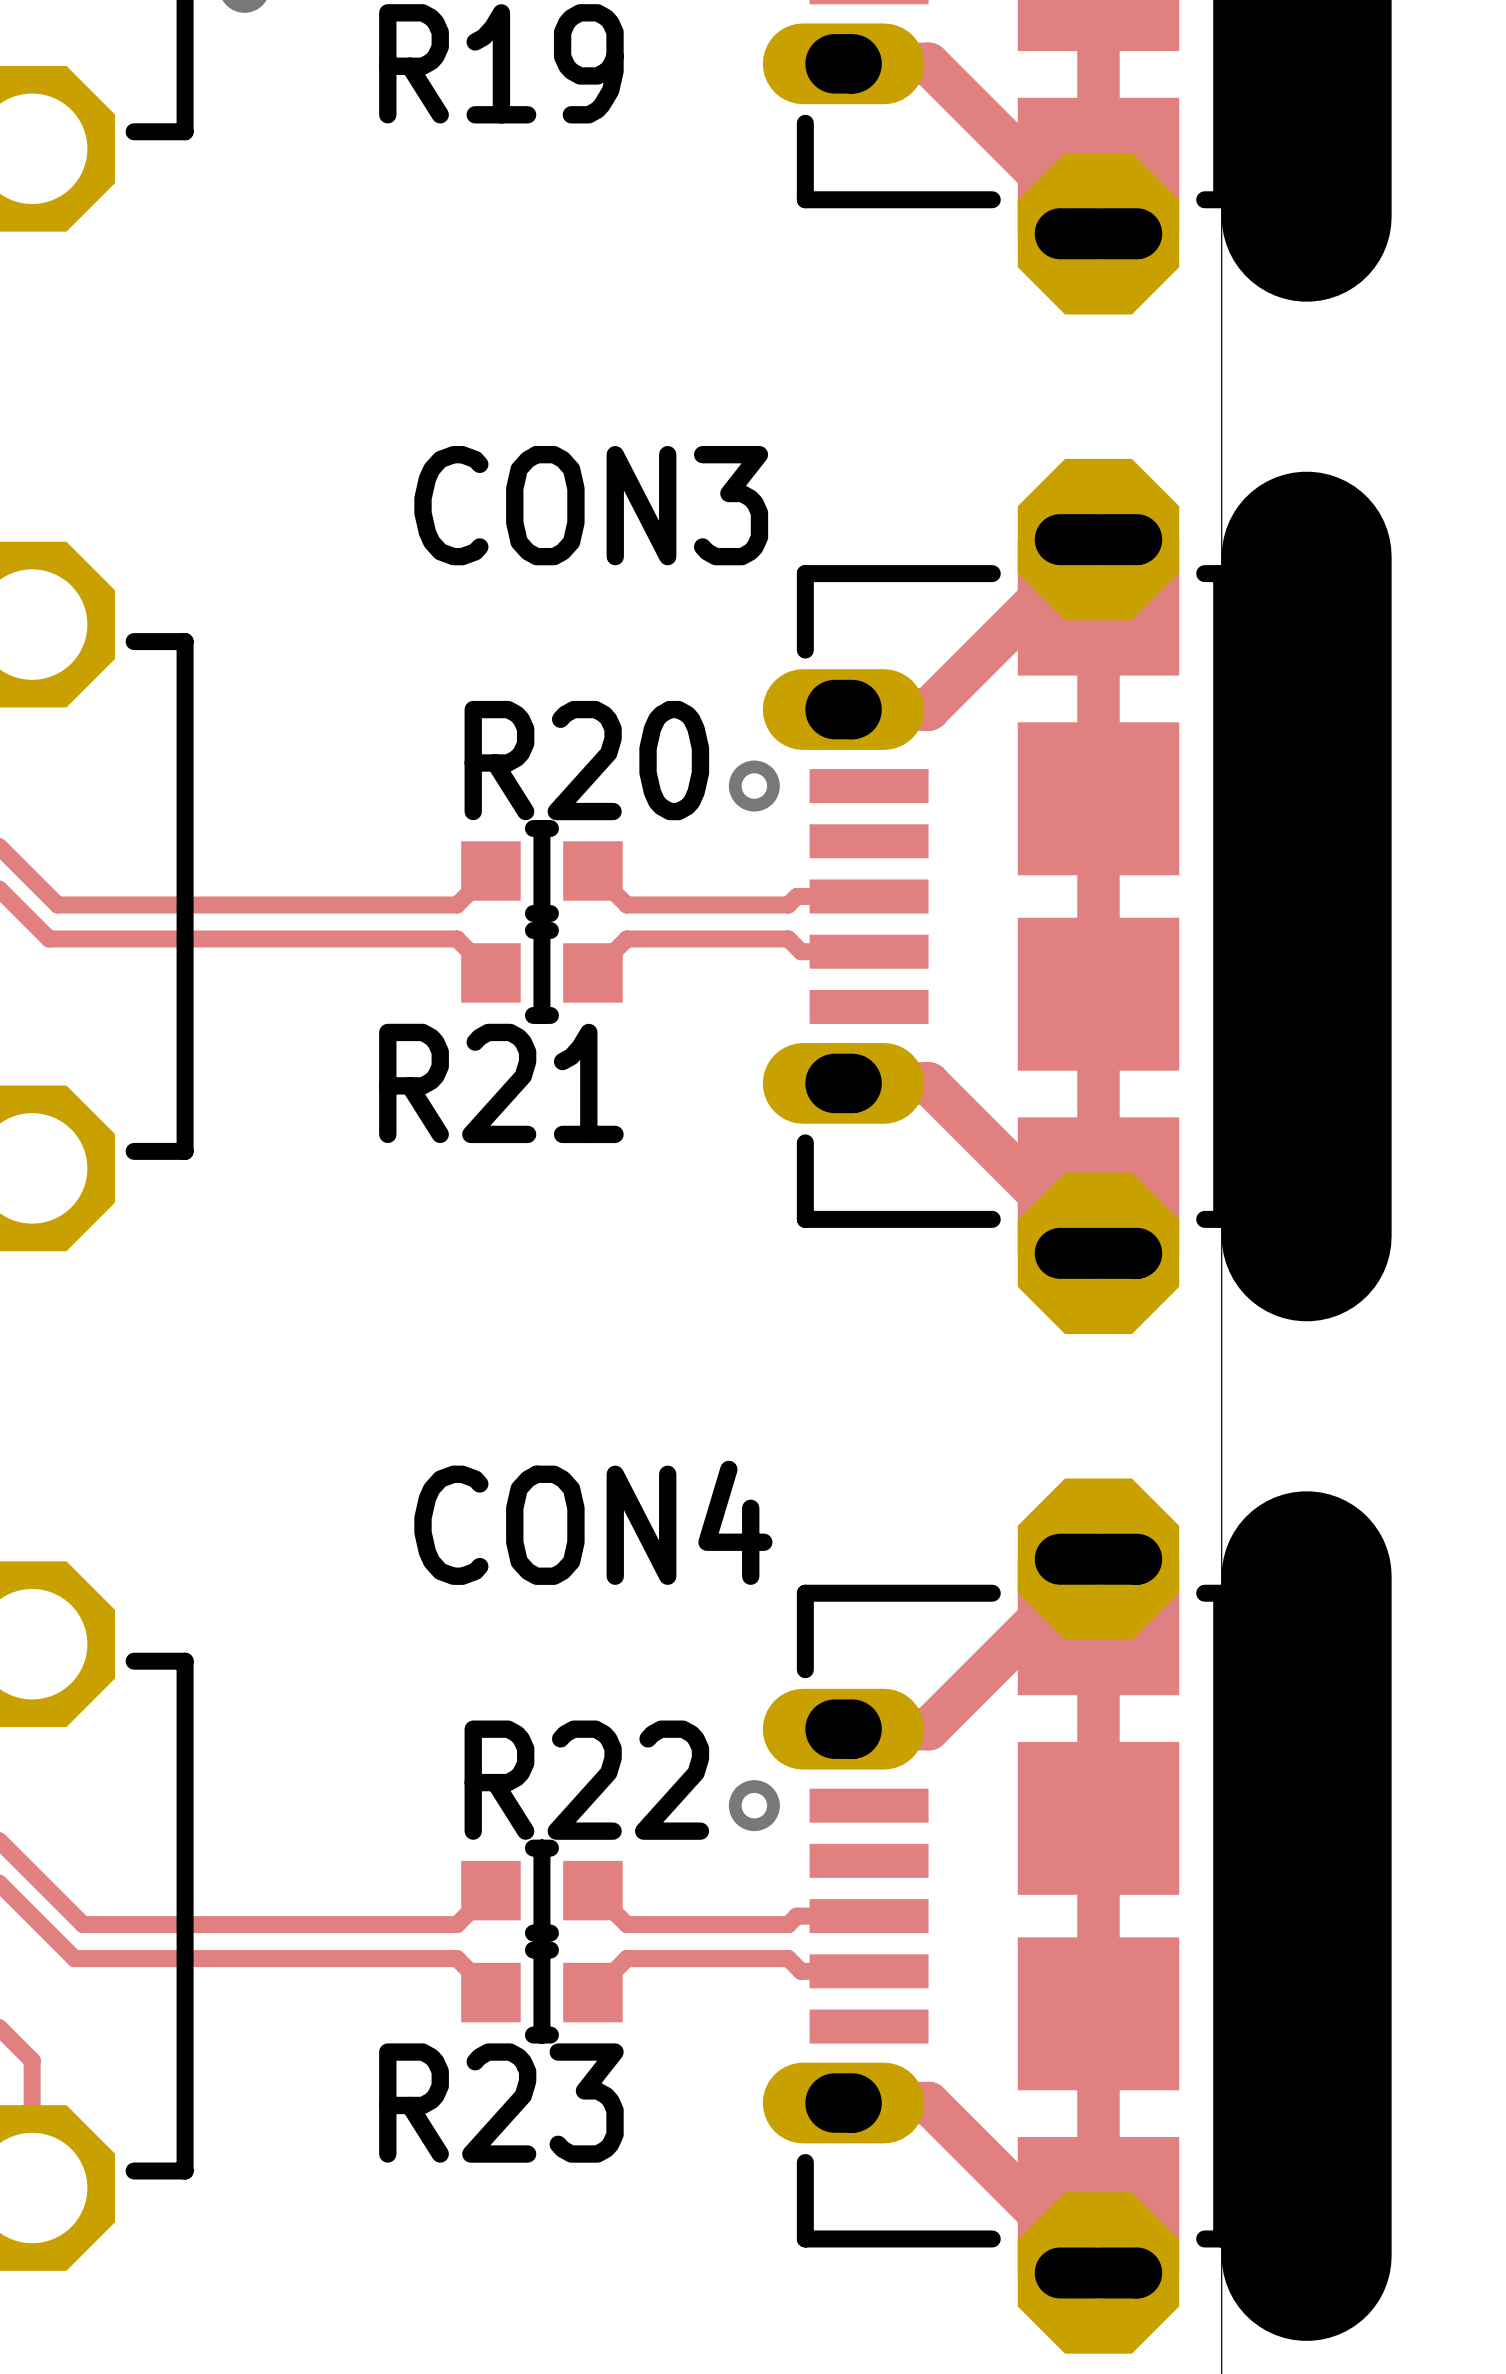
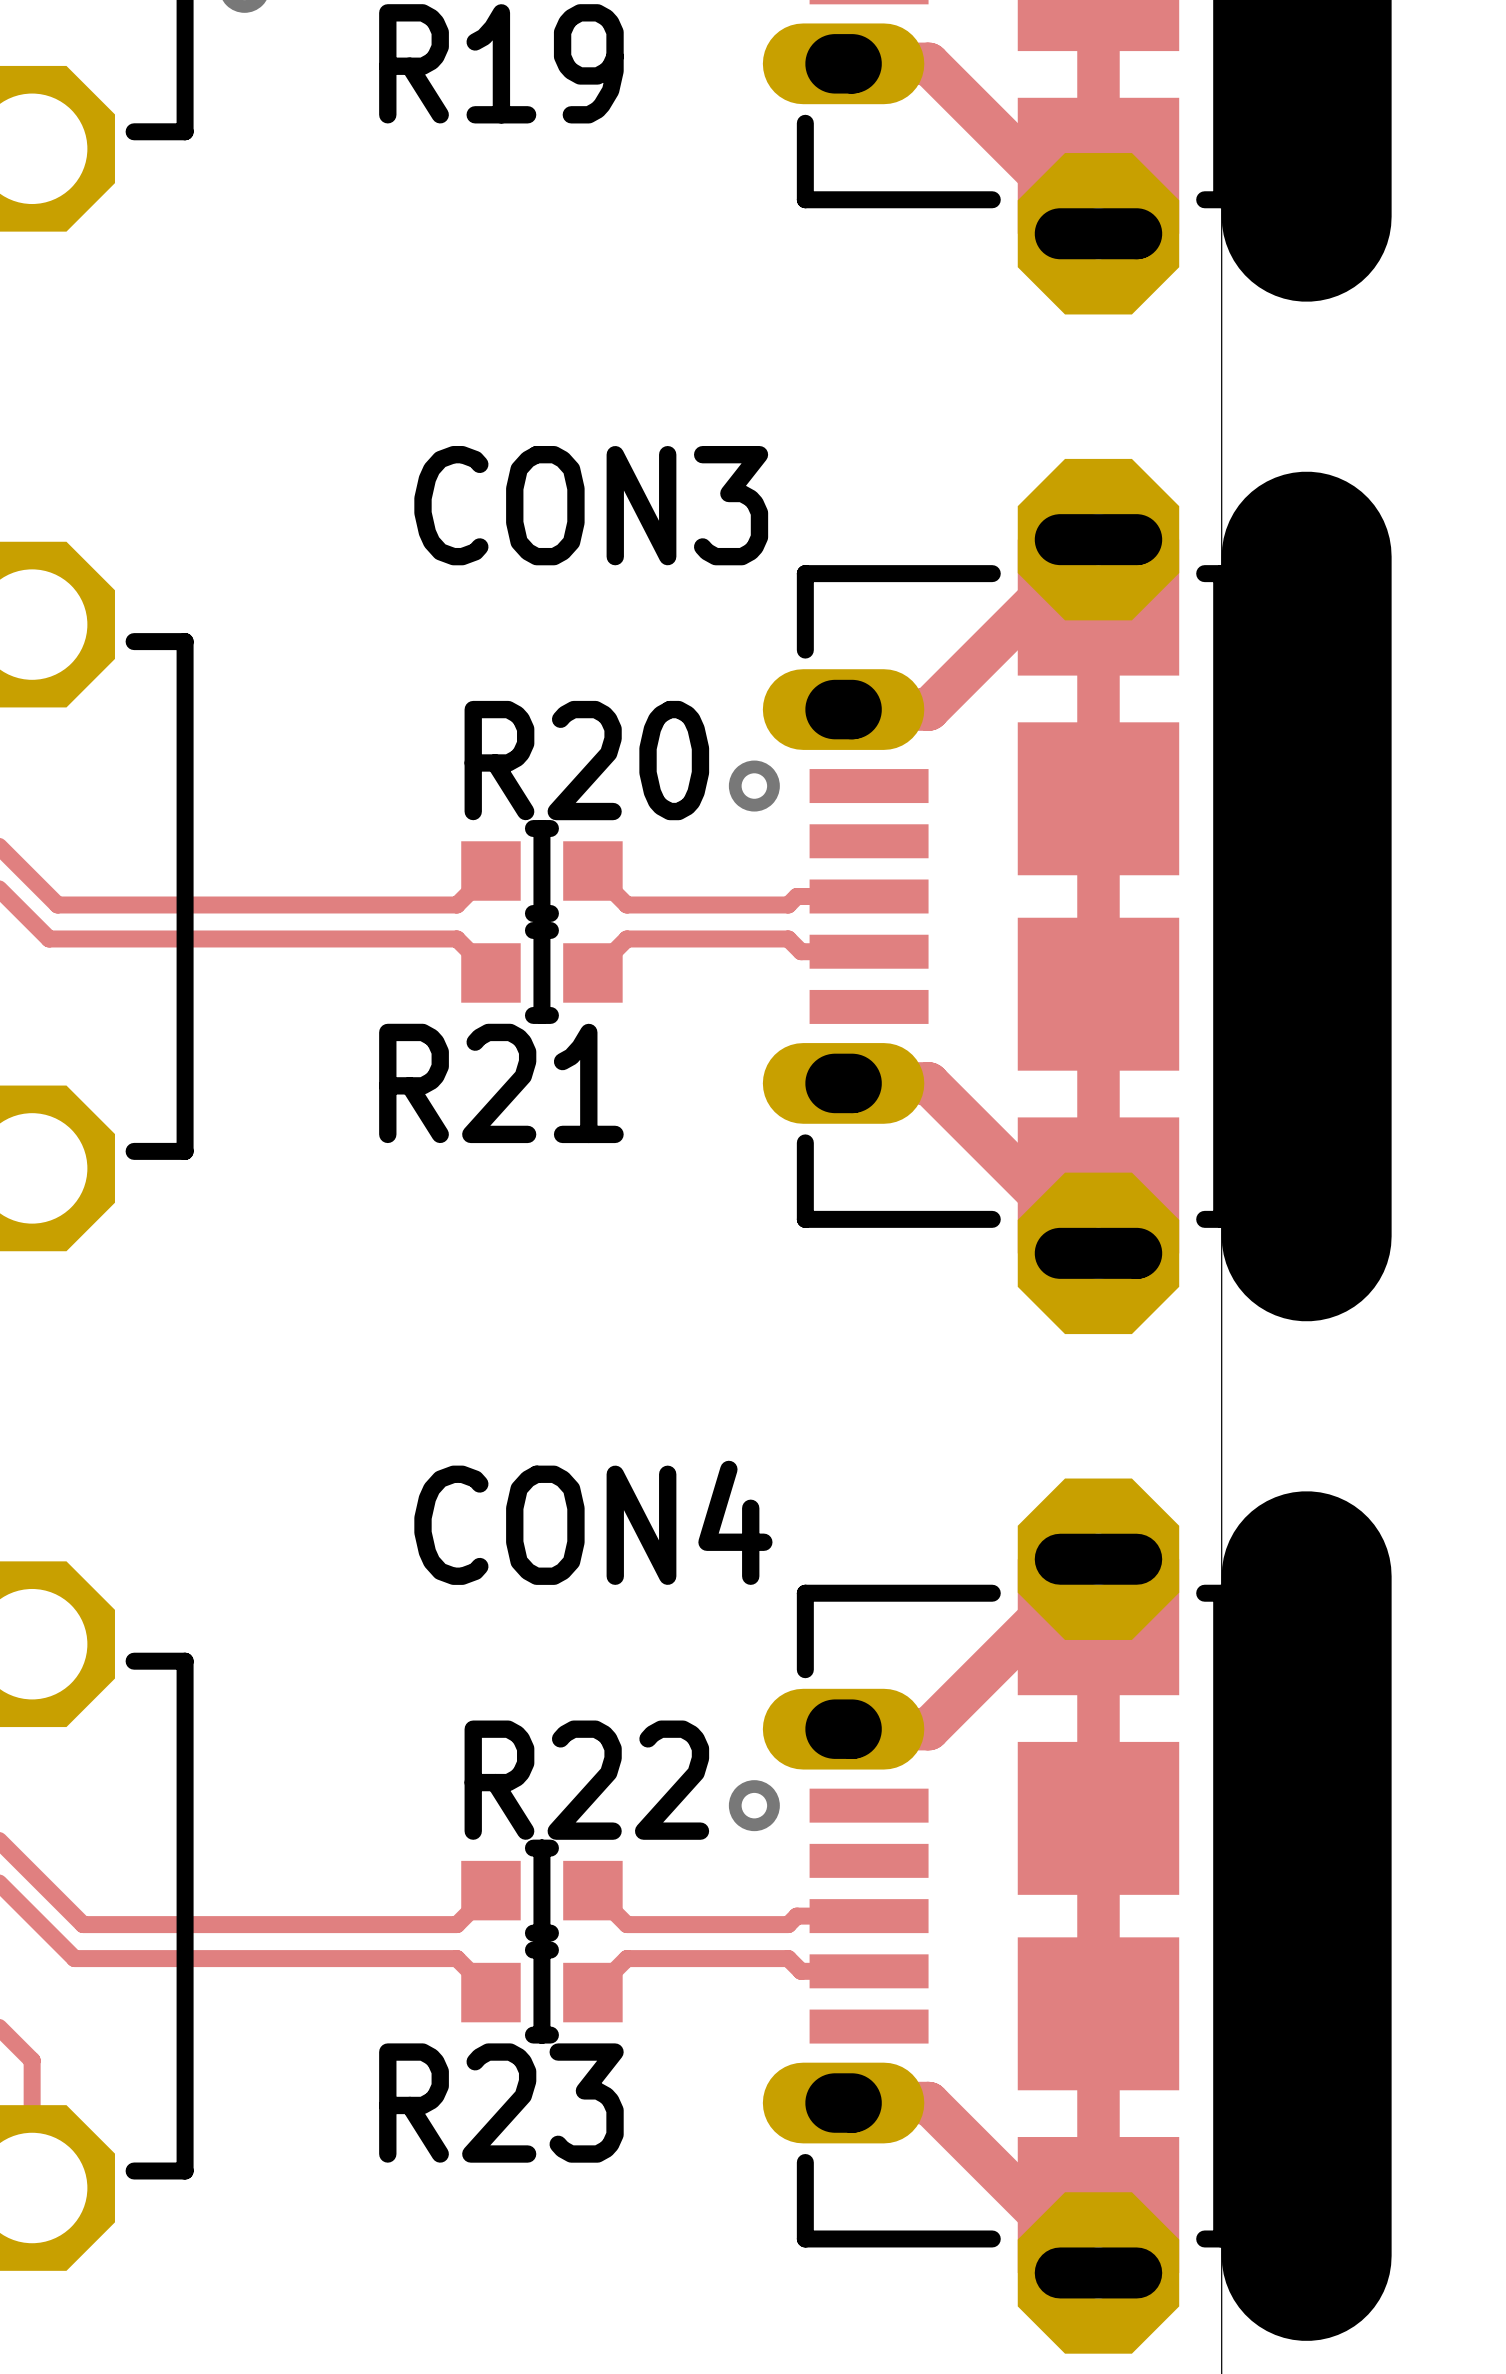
CON4 footprint: [762, 1478, 1231, 2354] -> [762, 1478, 1231, 2354]

